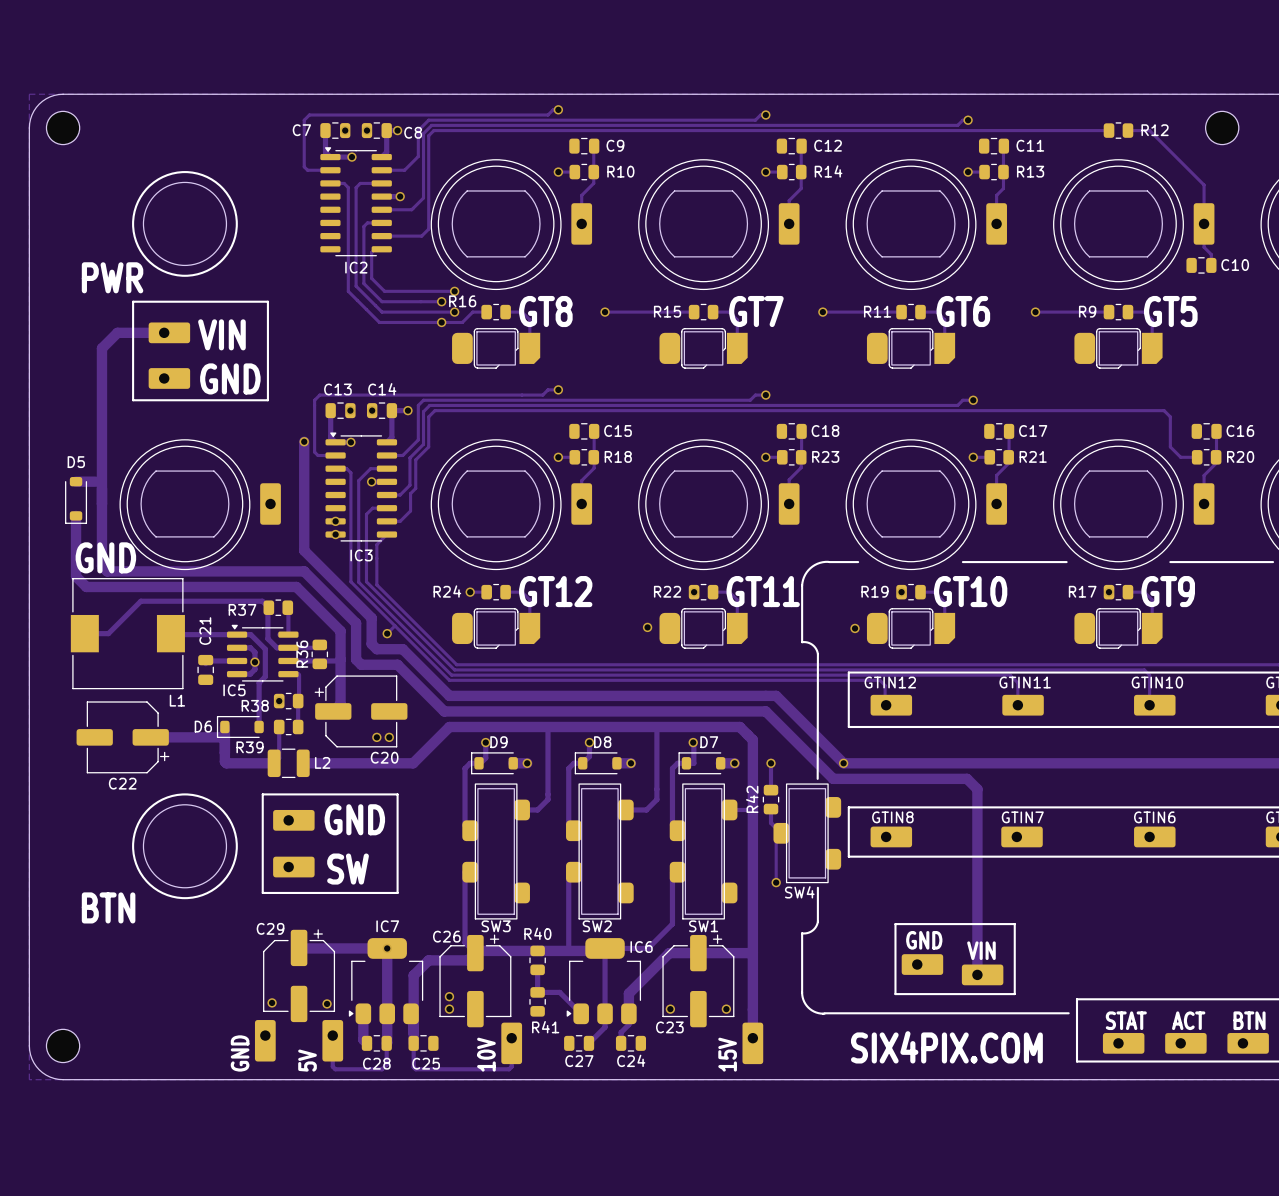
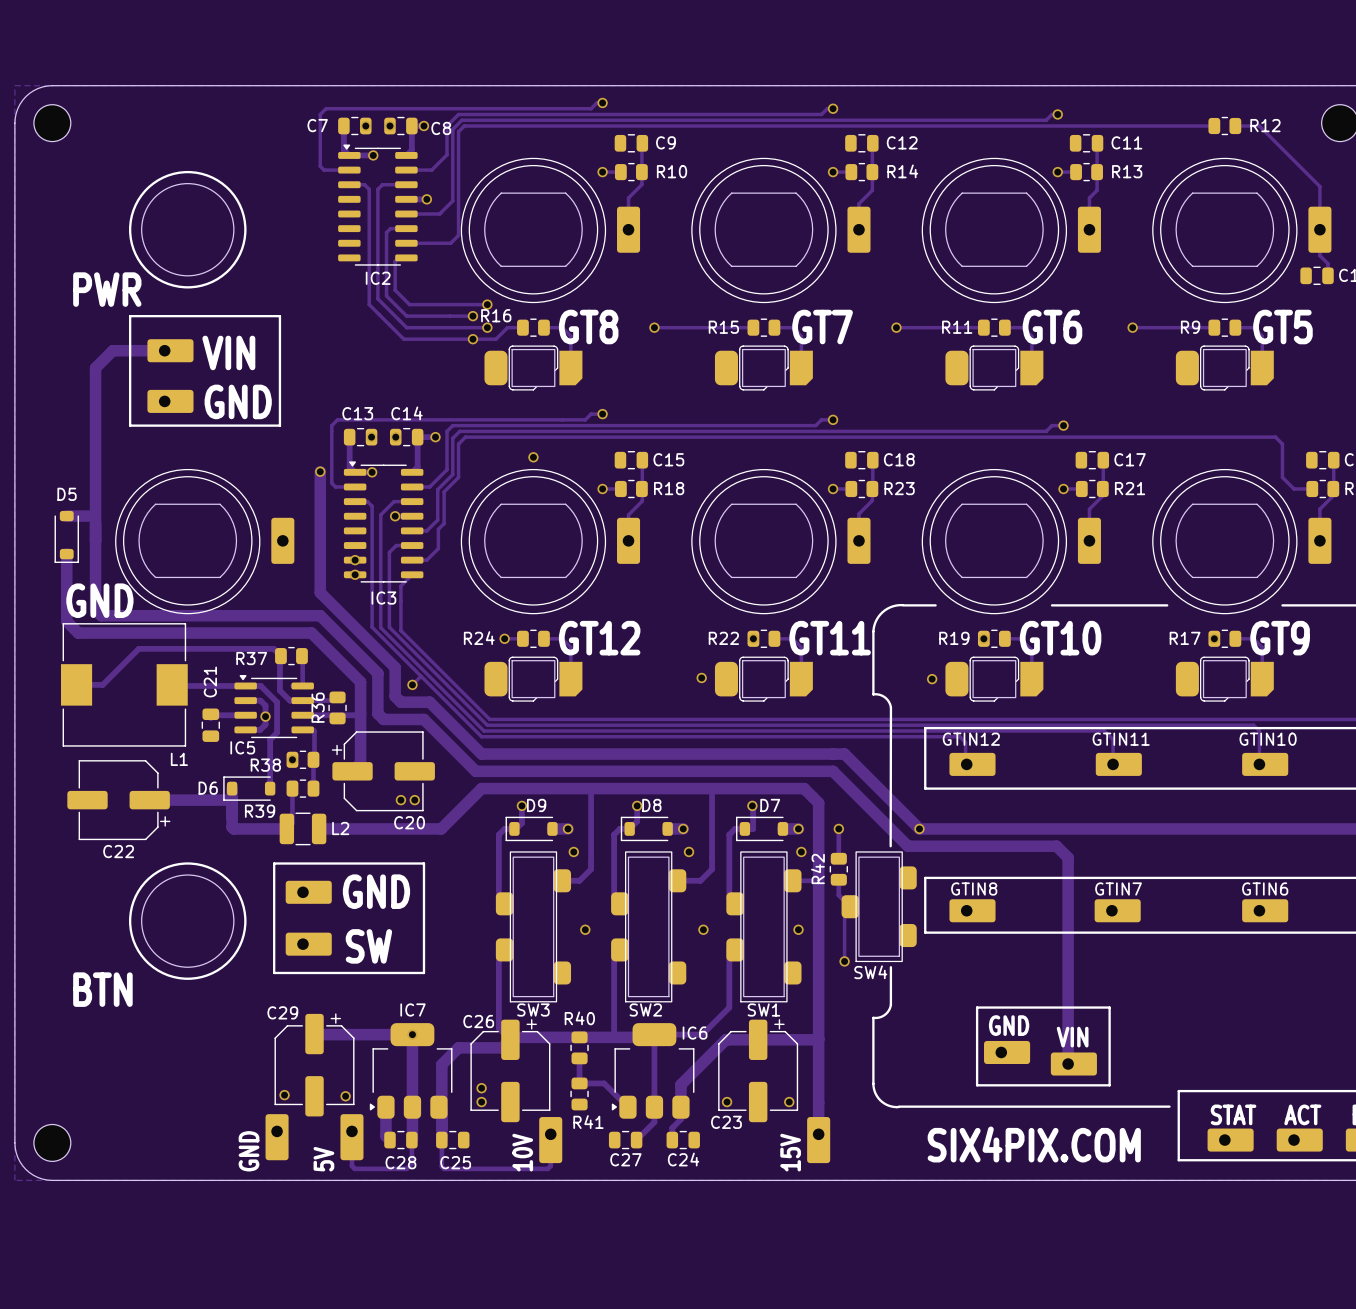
via: none -> (533, 457)
via: none -> (573, 851)
via: none -> (689, 851)
via: none -> (801, 851)
via: none -> (585, 929)
via: none -> (703, 929)
via: none -> (798, 929)

